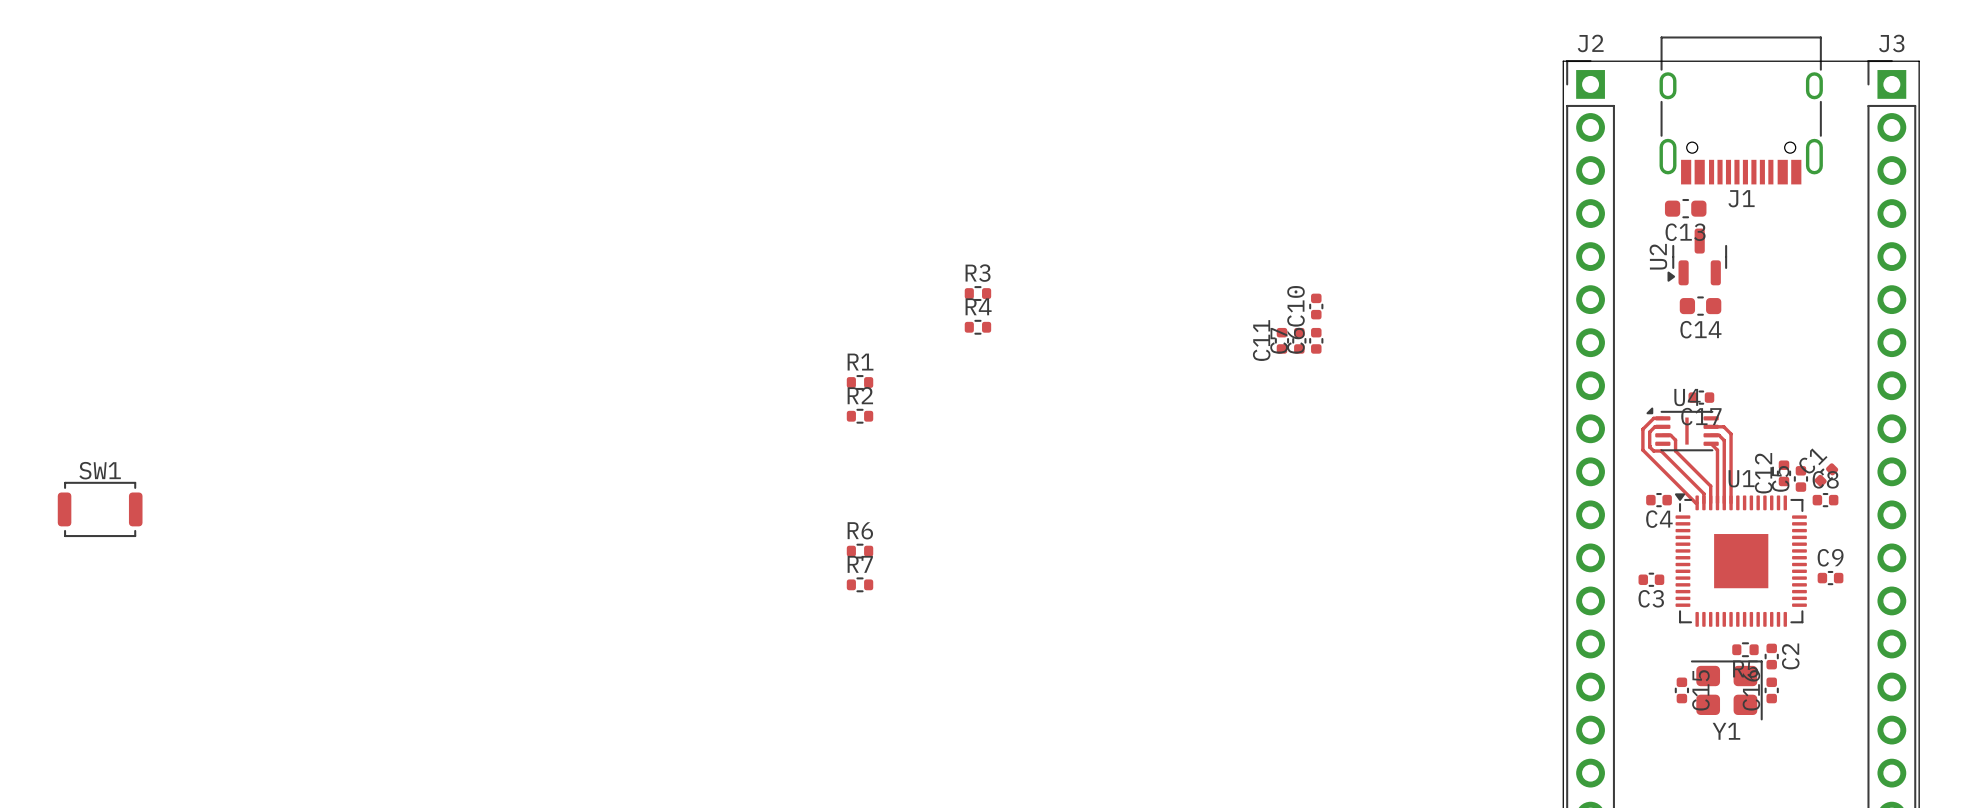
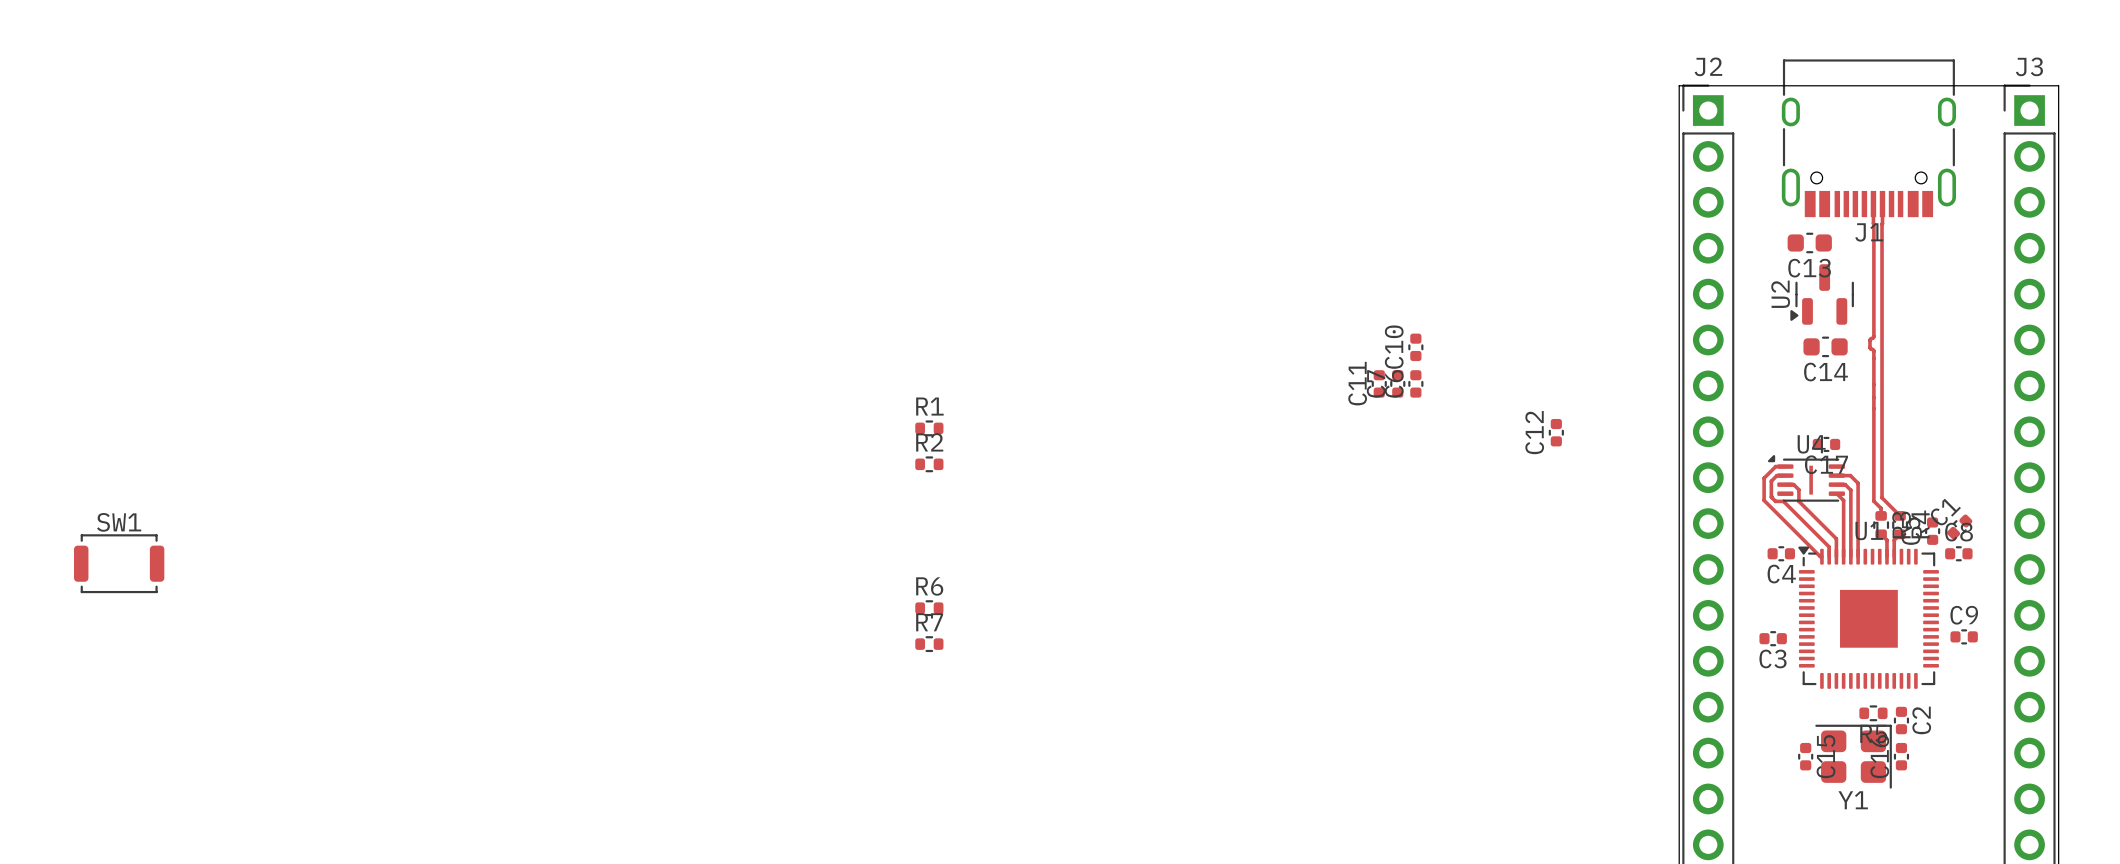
top track: none -> (1873, 204) (1873, 336) (1870, 339) (1869, 347) (1873, 351) (1873, 501) (1881, 508) (1881, 515)
top track: none -> (1882, 204) (1882, 497) (1900, 515)
R3 rotation: 0° (977, 293) -> 90° clockwise (1881, 525)
R3 position: (977, 293) -> (1881, 525)
R4 rotation: 0° (977, 327) -> 90° clockwise (1900, 525)
R4 position: (977, 327) -> (1900, 525)
C12 position: (1784, 473) -> (1556, 432)
top track: none -> (1881, 534) (1886, 540) (1886, 556)
top track: none -> (1900, 534) (1894, 540) (1894, 556)

